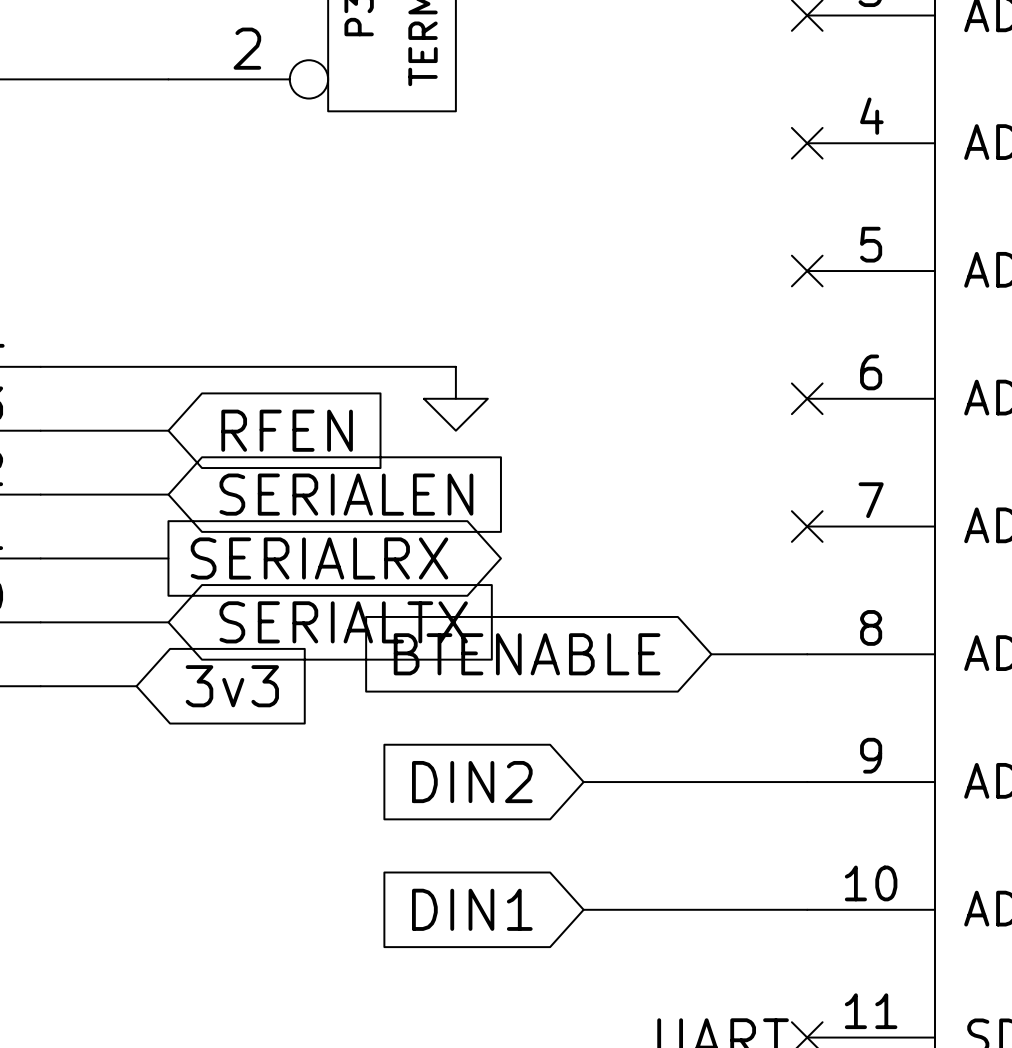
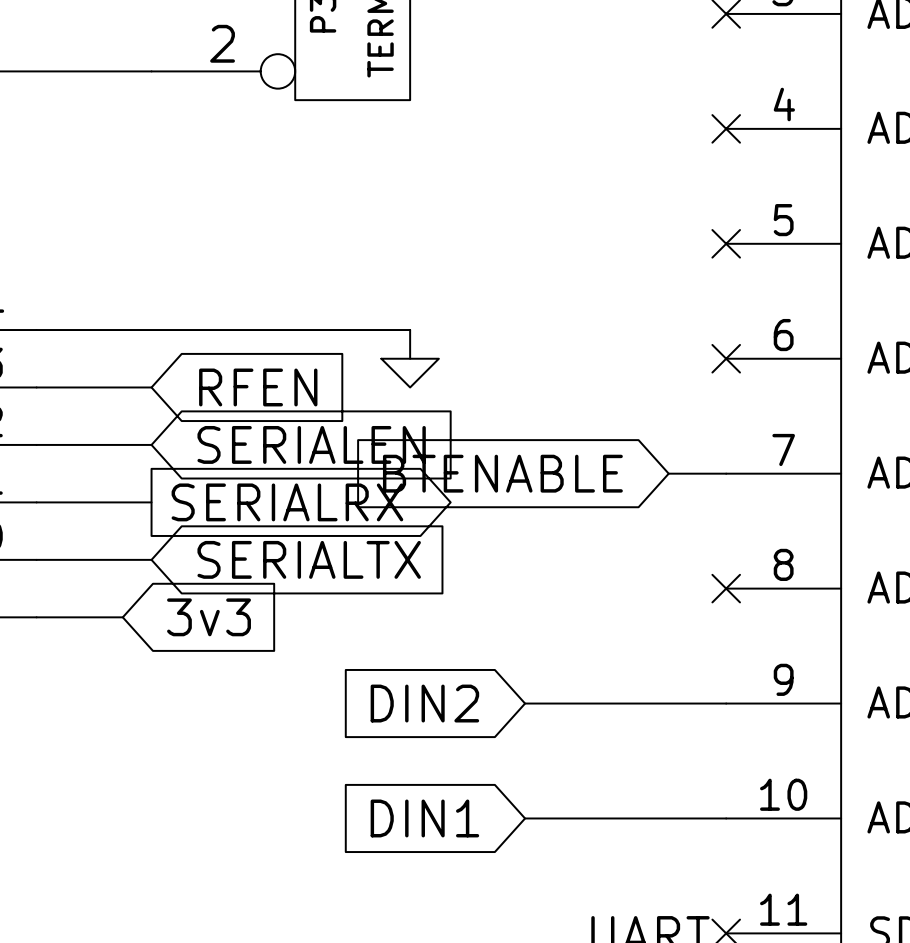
wire: none -> (668, 473) (726, 473)
no-connect mark position: (807, 526) -> (726, 588)
global label position: BTENABLE (527, 654) -> BTENABLE (502, 473)
wire: (711, 654) (807, 654) -> none

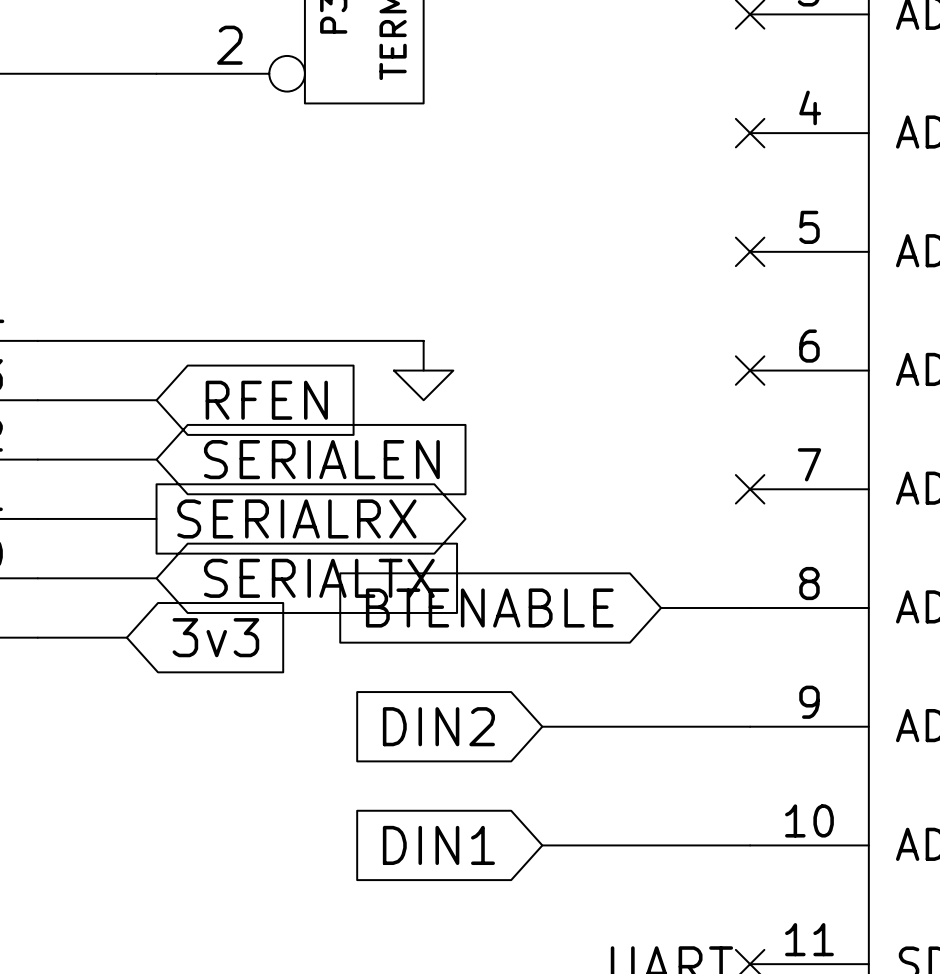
global label position: BTENABLE (502, 473) -> BTENABLE (489, 607)
wire: (668, 473) (726, 473) -> none
wire: none -> (661, 607) (750, 607)
no-connect mark position: (726, 588) -> (750, 489)

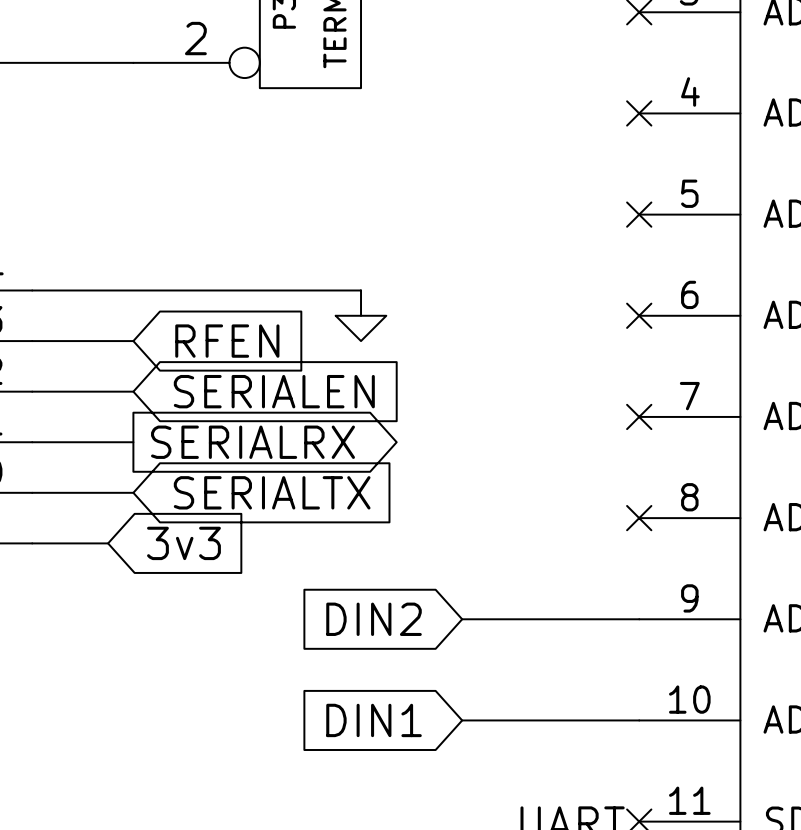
global label: BTENABLE (489, 607) -> none
wire: (661, 607) (750, 607) -> none
no-connect mark: none -> (639, 518)

